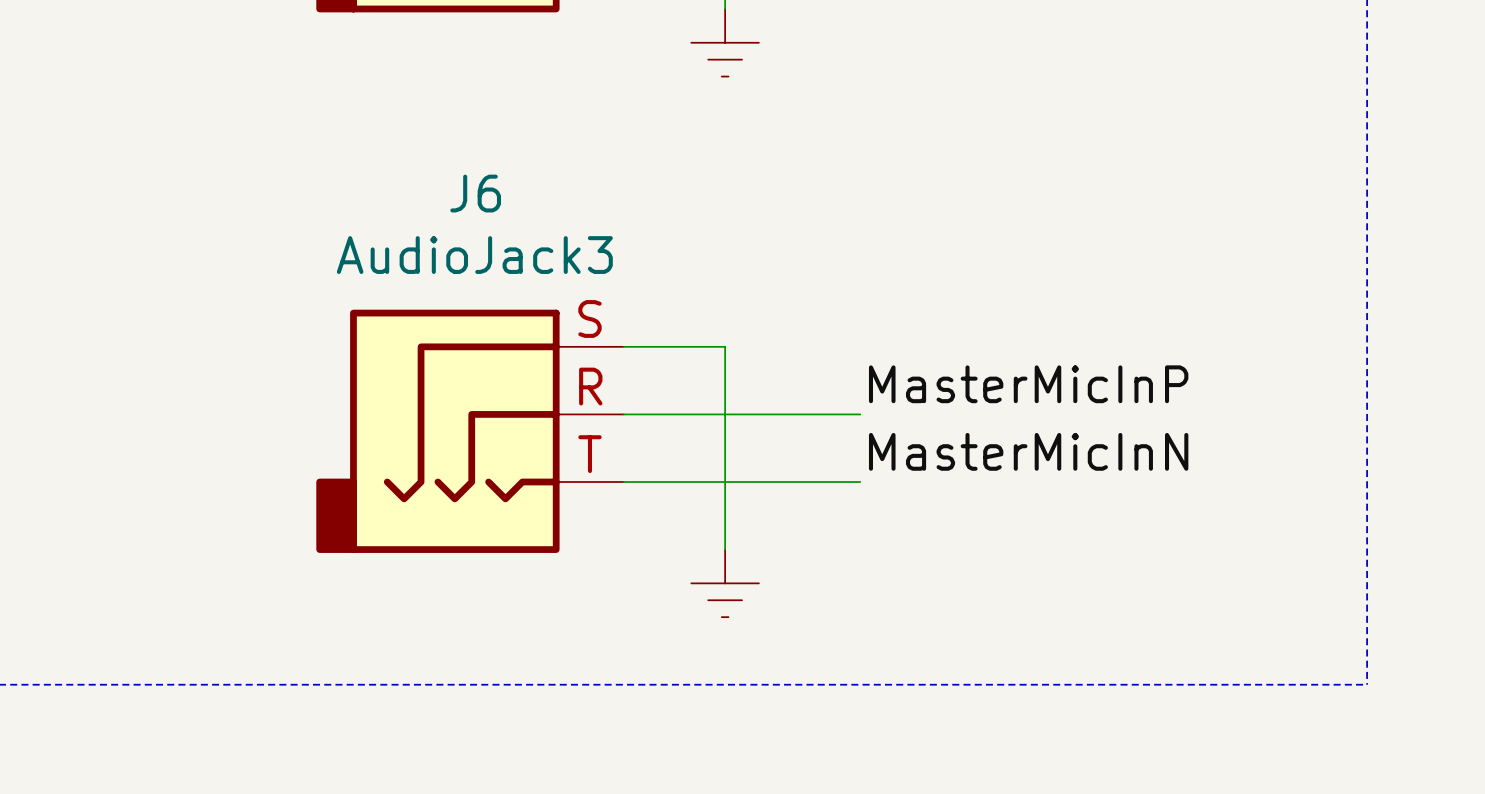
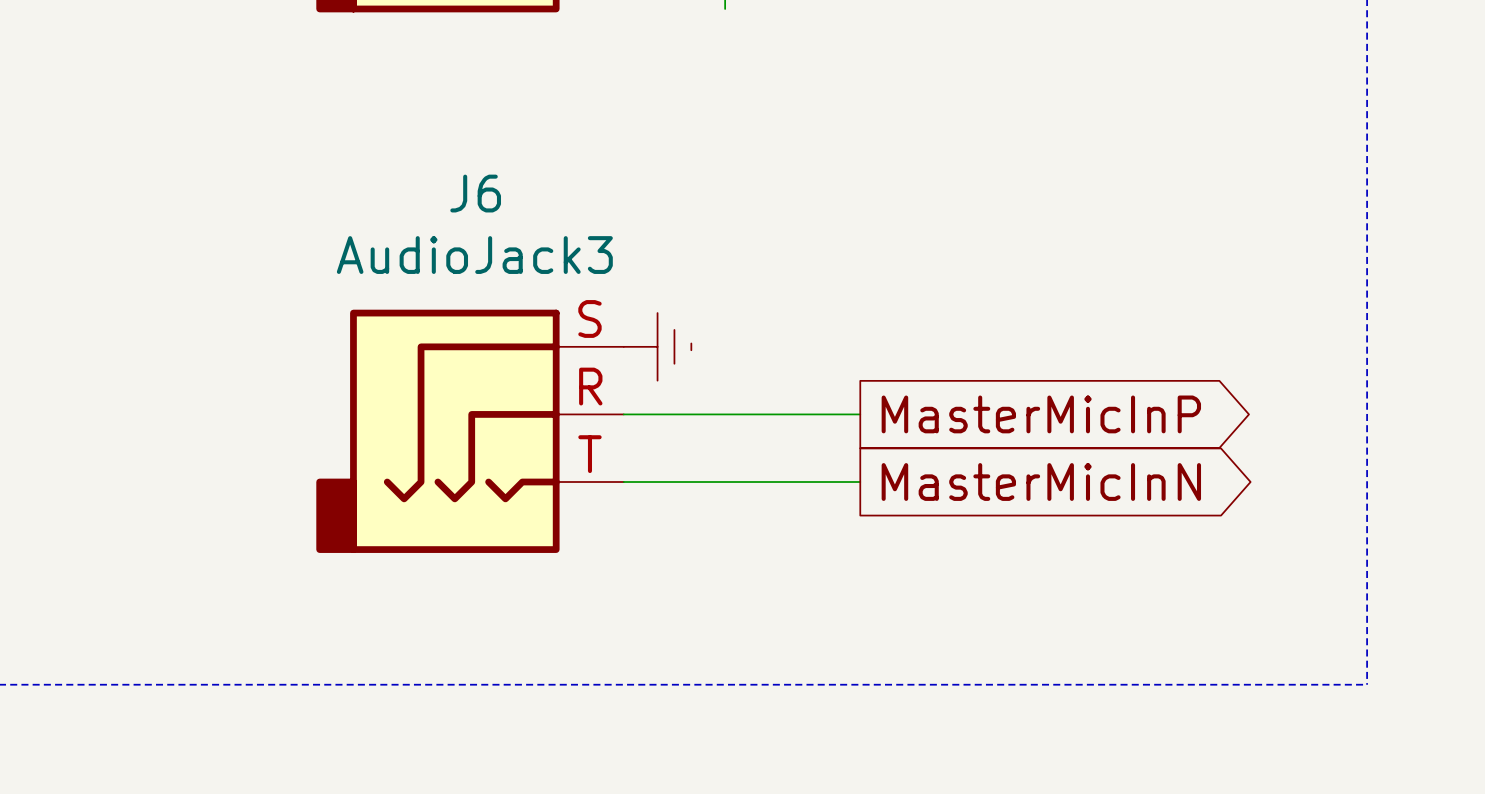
power symbol: (725, 42) -> none
wire: (623, 346) (725, 346) (725, 549) -> none
power symbol: none -> (657, 346)
label: MasterMicInP (1028, 384) -> none
global label: none -> MasterMicInP (1041, 414)
label: MasterMicInN (1028, 451) -> none
global label: none -> MasterMicInN (1041, 482)
power symbol: (725, 583) -> none

